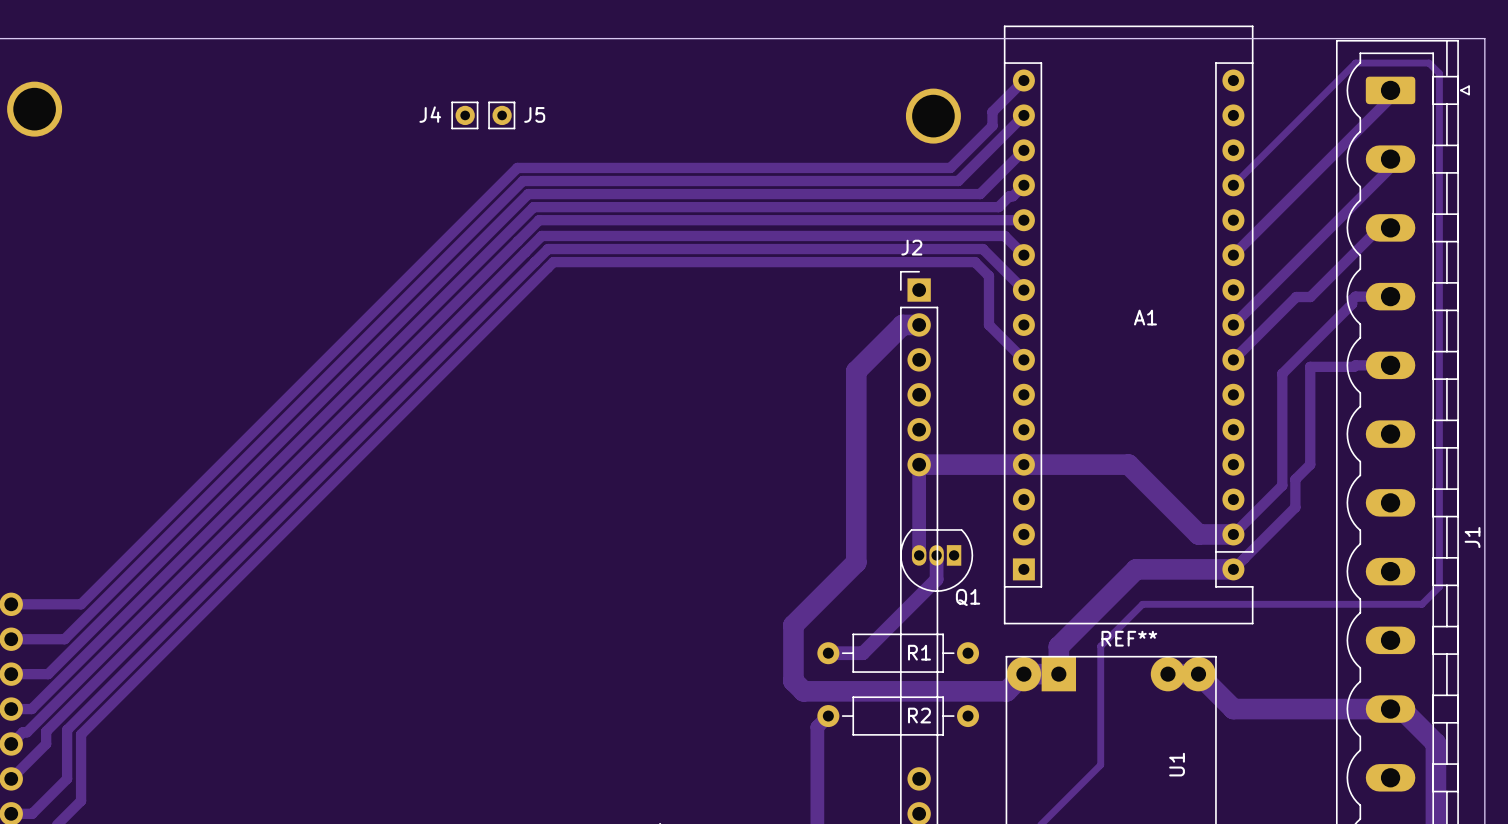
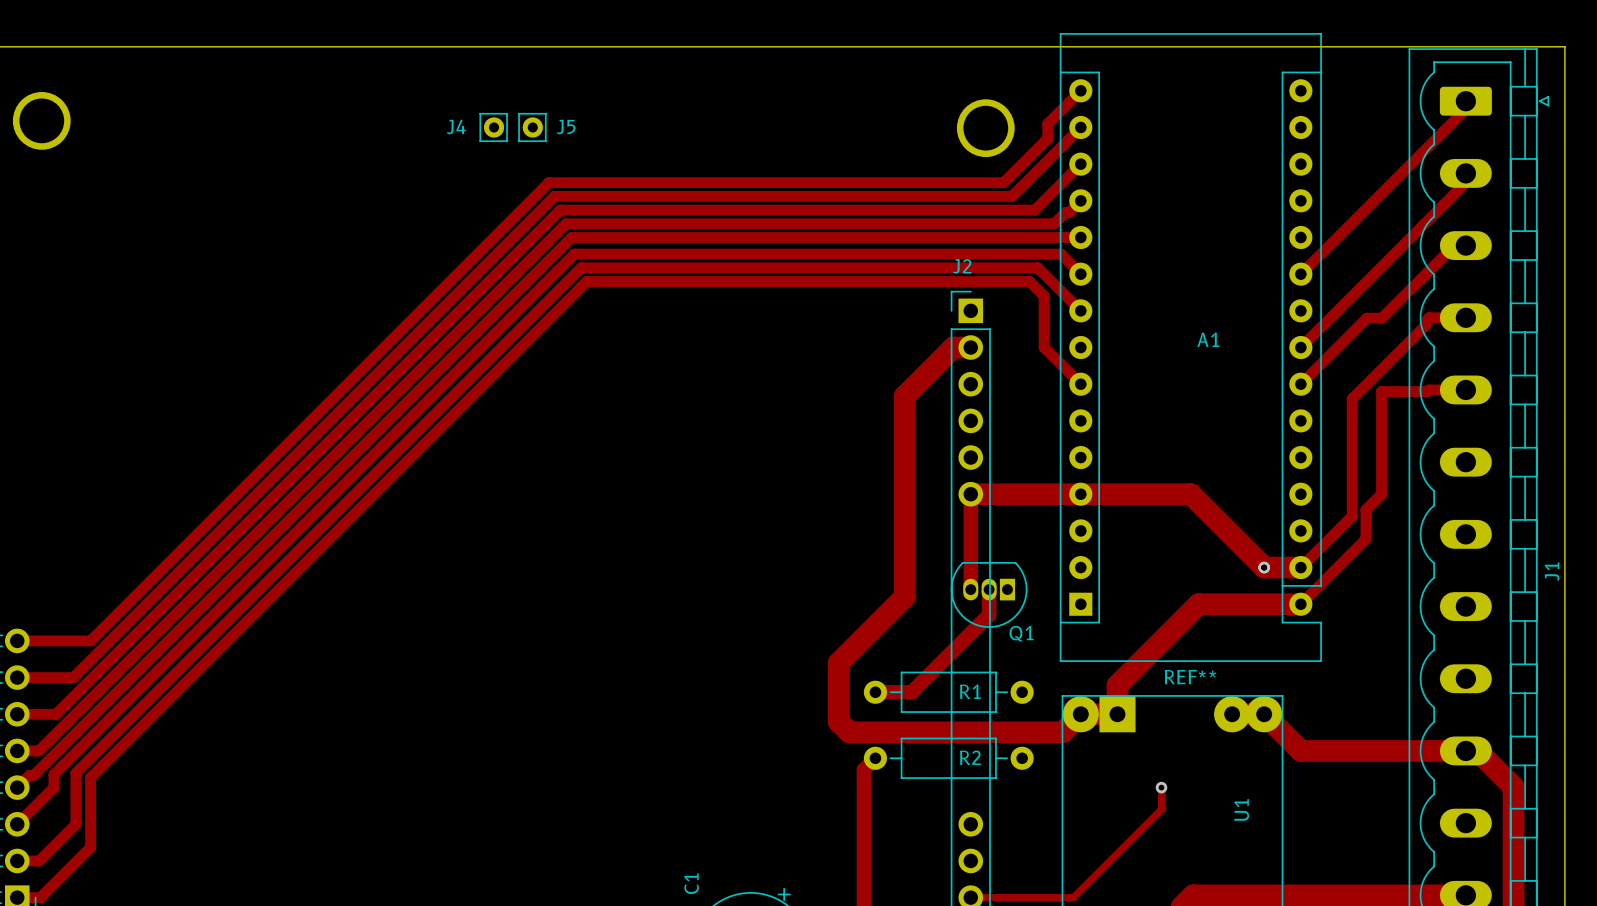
track: (1233, 185) (1355, 63) (1428, 63) (1439, 73) (1439, 586) (1421, 604) (1142, 604) (1100, 646) (1100, 743) -> none
via: none -> (1264, 567)
via: none -> (1161, 787)

